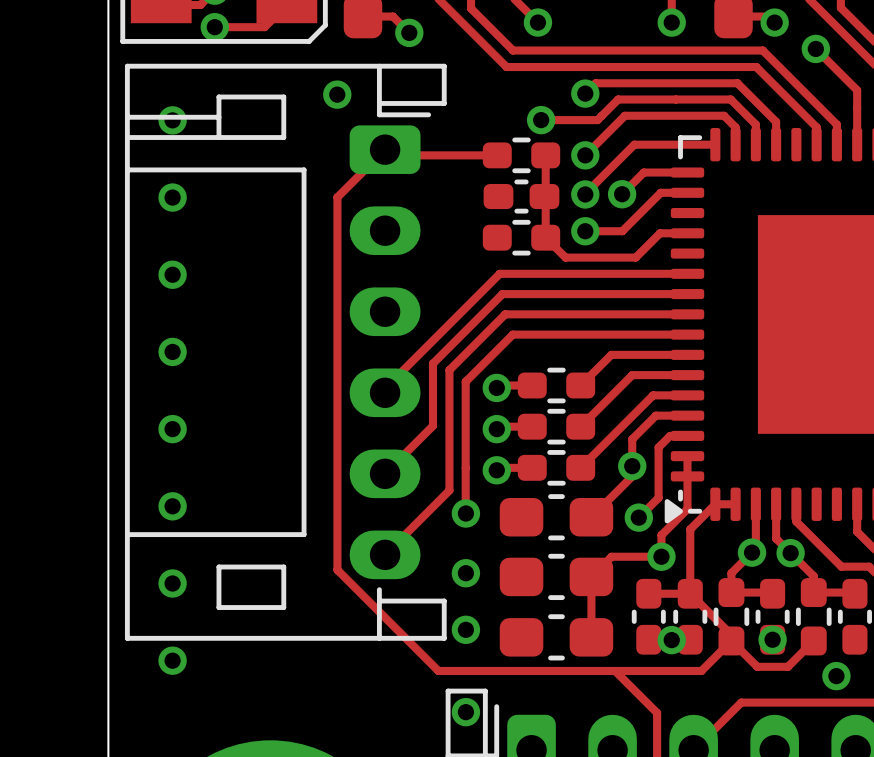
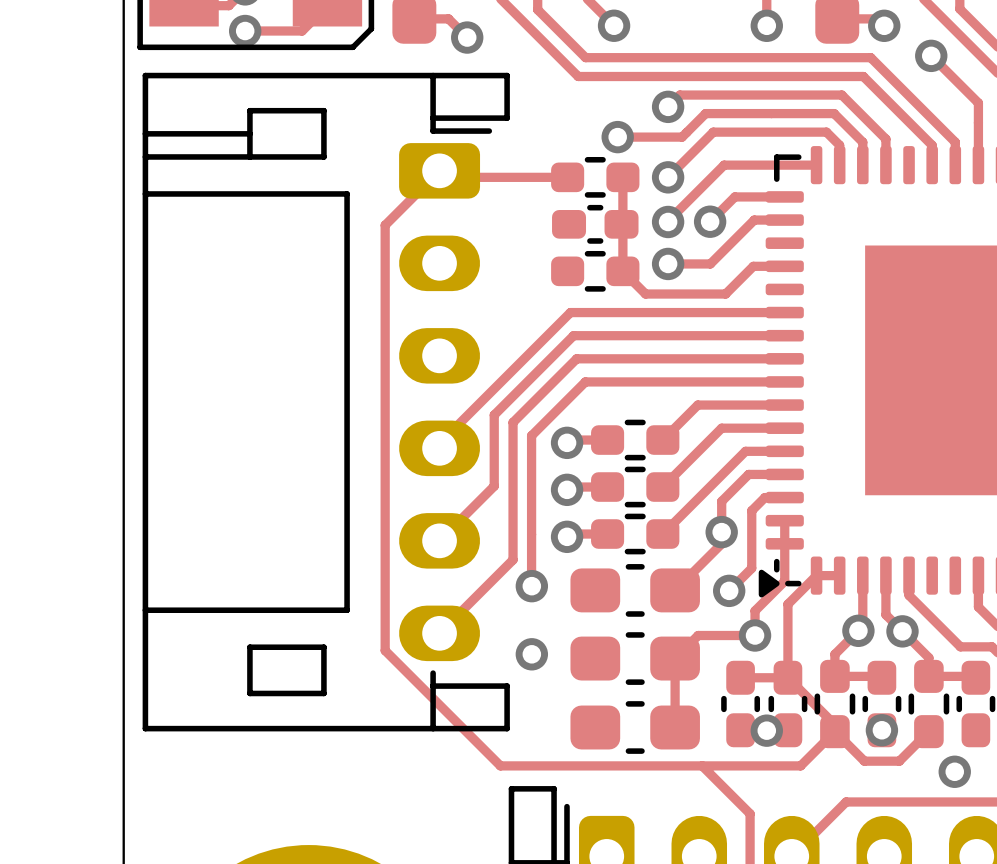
via: (337, 94) -> none
via: (172, 120) -> none
via: (172, 197) -> none
via: (172, 274) -> none
via: (172, 351) -> none
via: (172, 429) -> none
via: (172, 506) -> none
via: (172, 583) -> none
via: (465, 629) -> none
via: (172, 660) -> none
via: (465, 712) -> none

